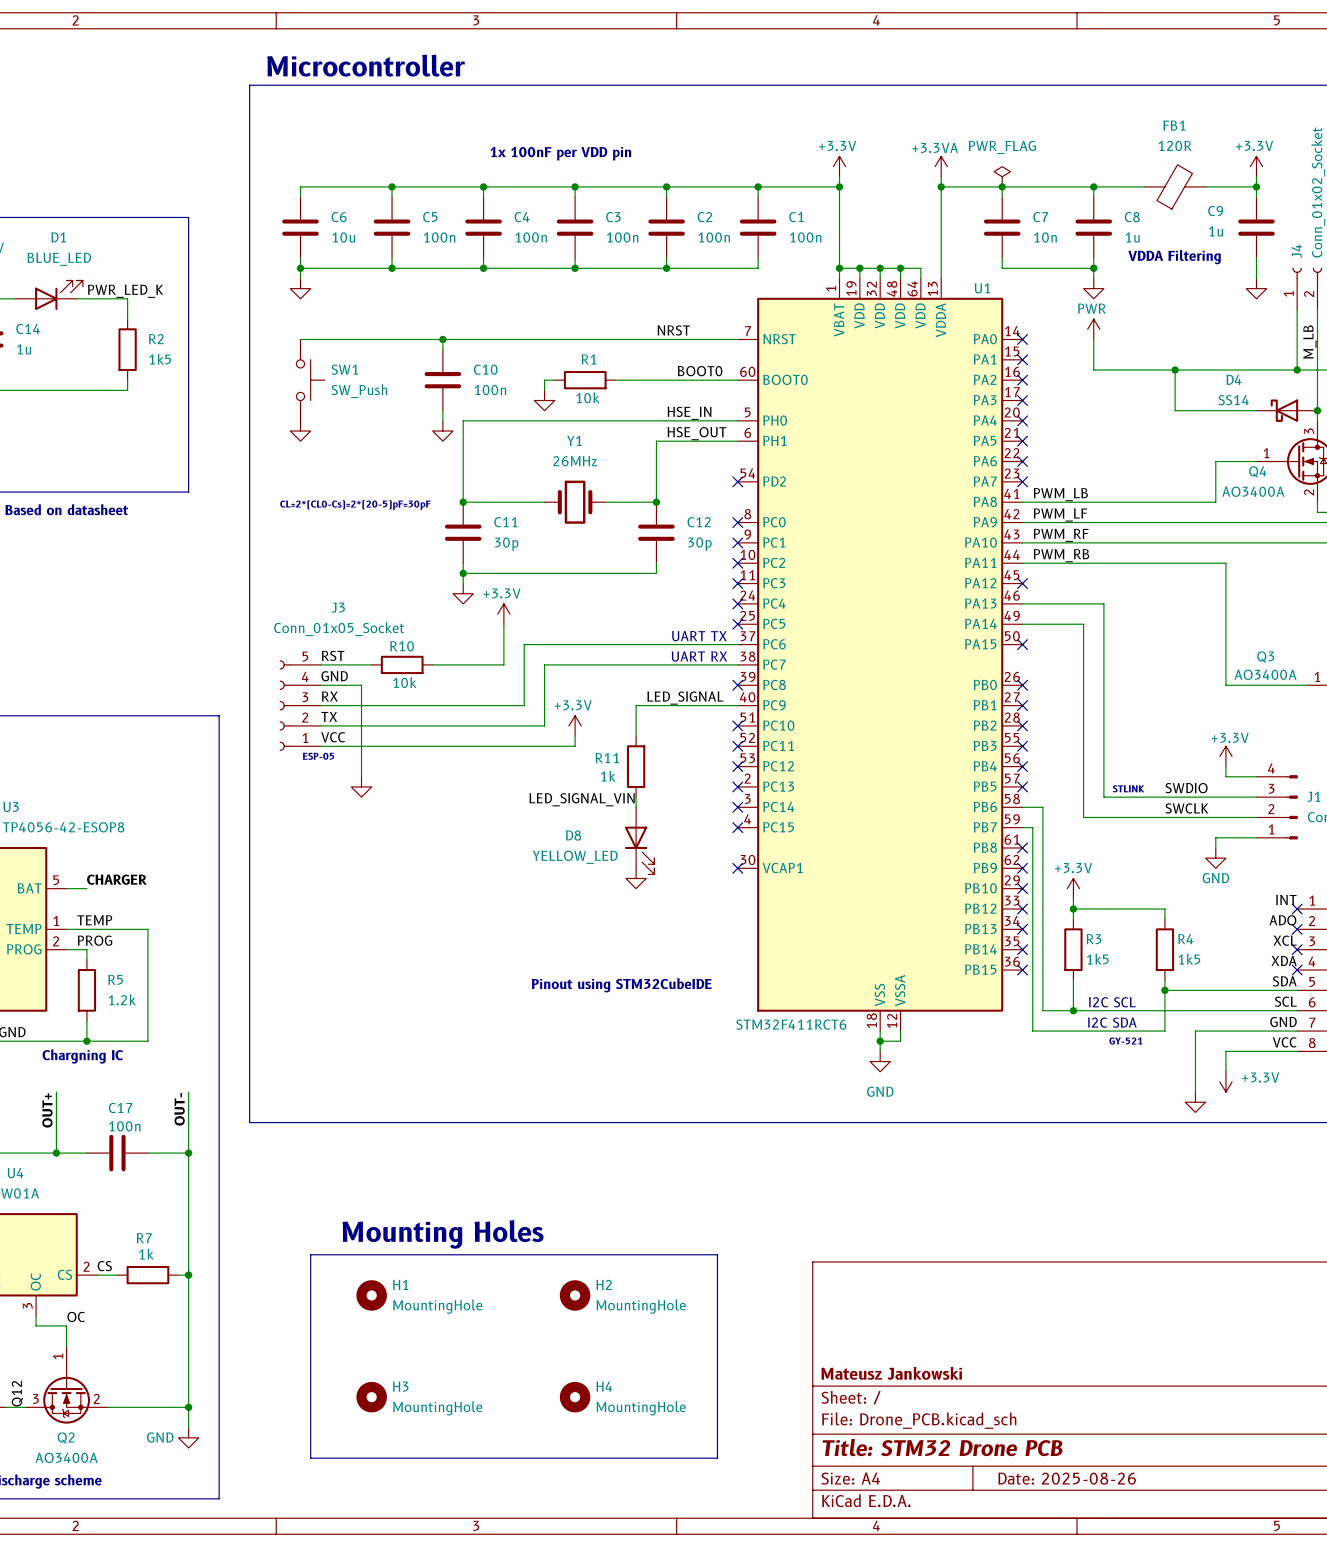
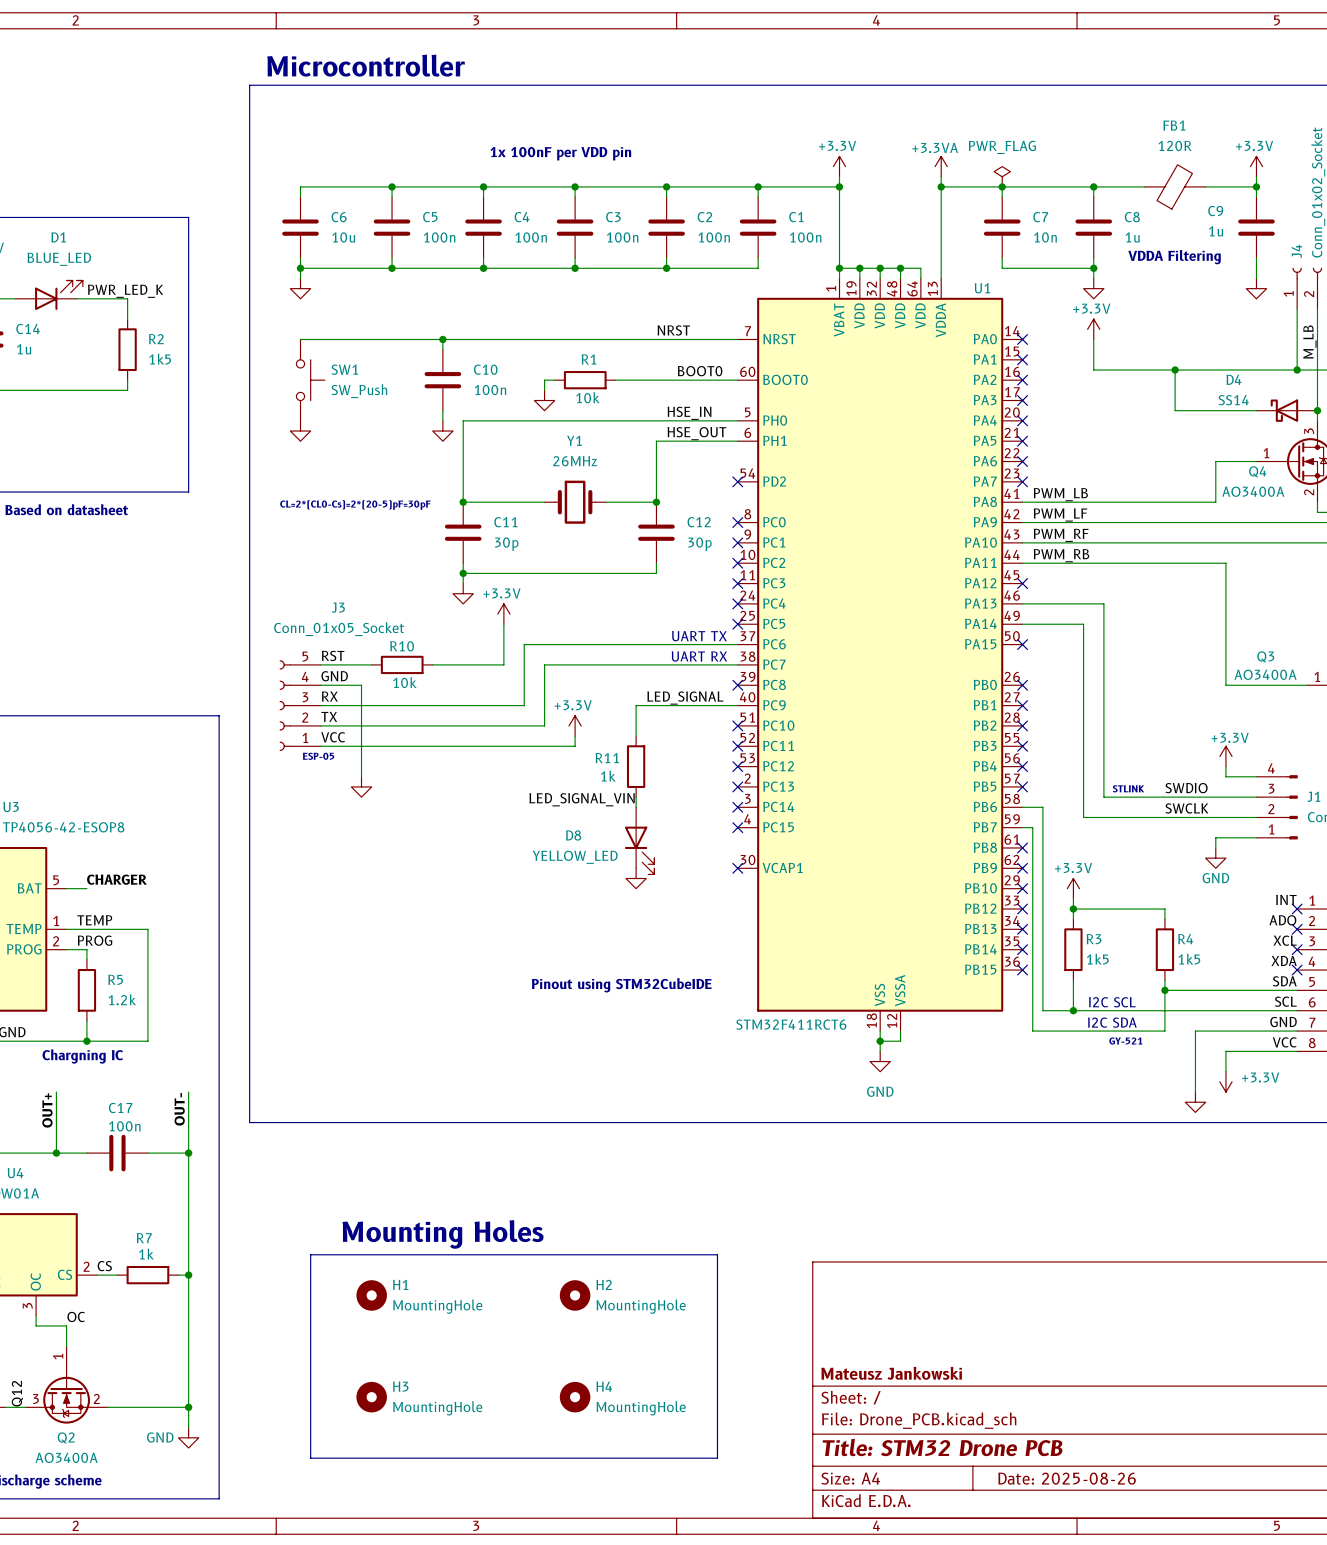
power symbol: PWR (1093, 329) -> +3.3V (1093, 329)

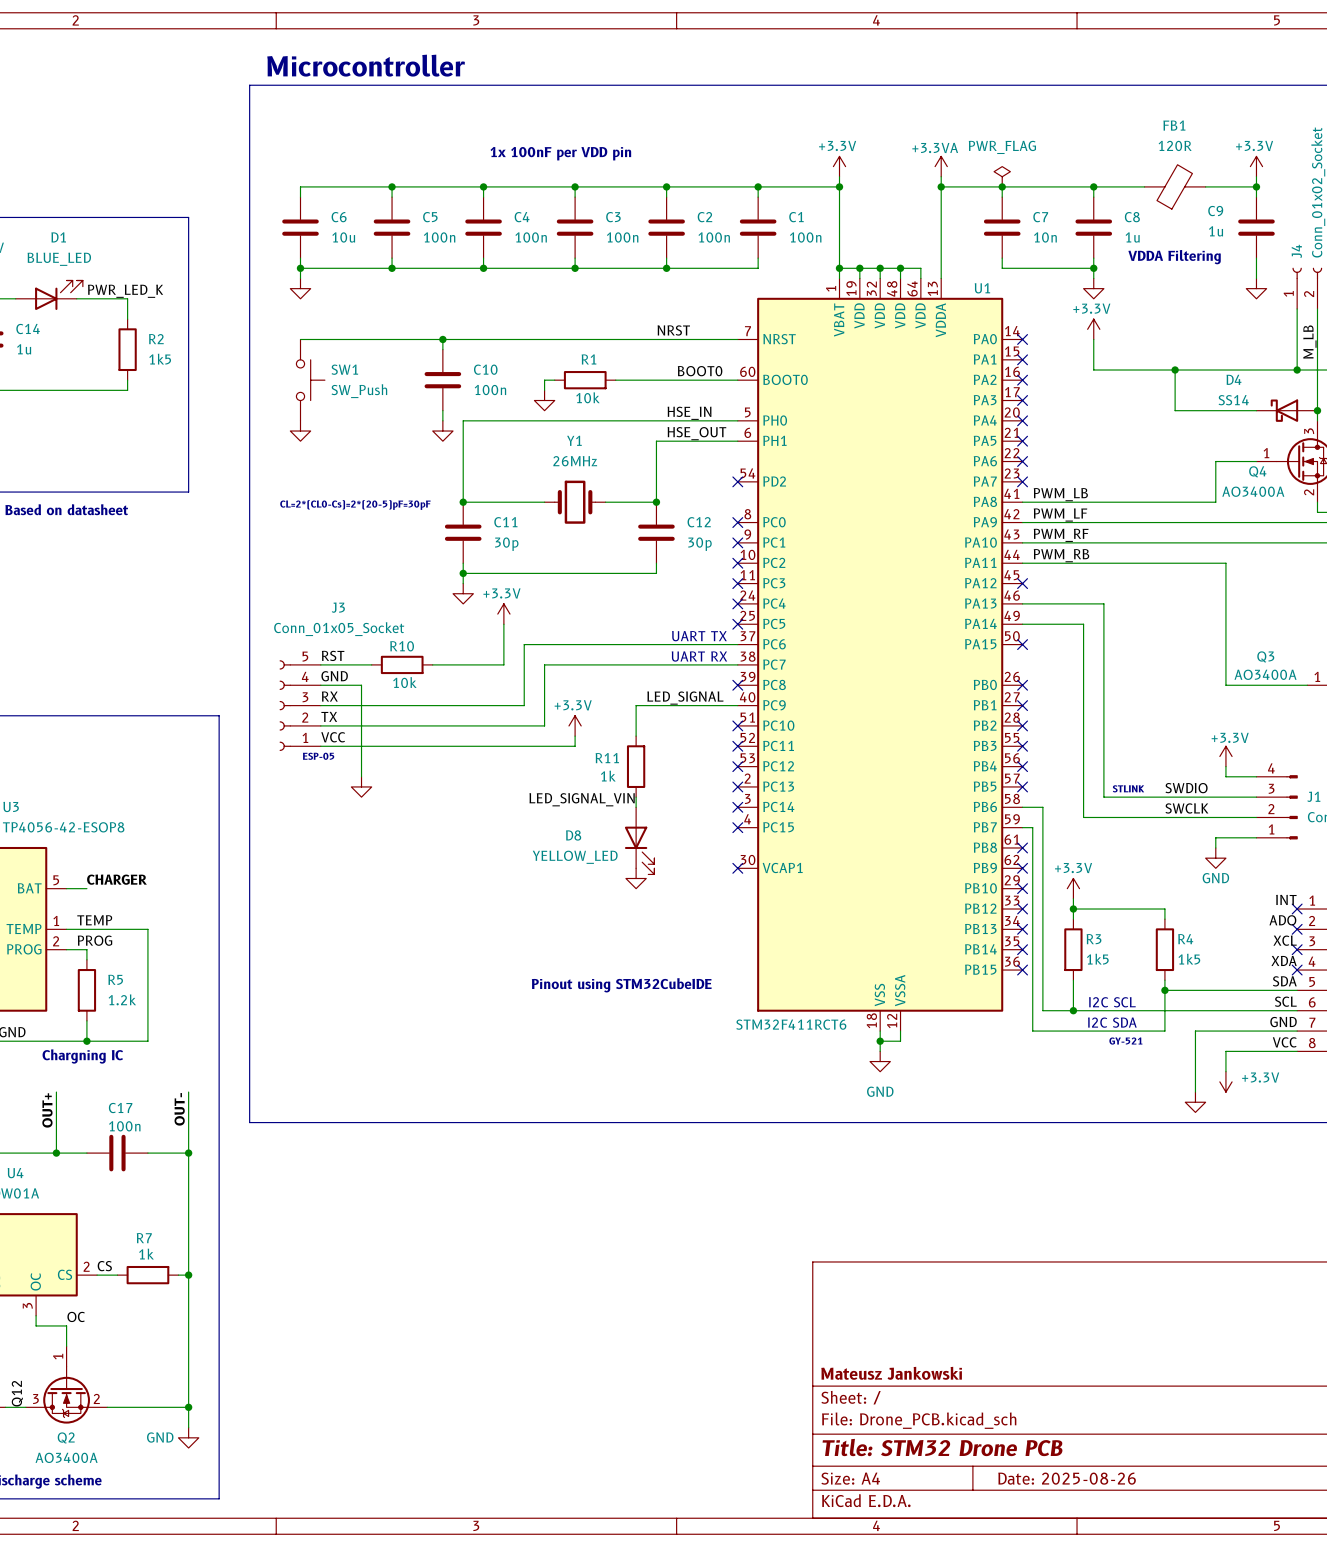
text: Mounting Holes (443, 1234) -> none
line: (310, 1254) (717, 1254) (717, 1458) (310, 1458) (310, 1254) -> none
H1: MountingHole (371, 1295) -> none
H2: MountingHole (575, 1295) -> none
H3: MountingHole (371, 1397) -> none
H4: MountingHole (575, 1397) -> none

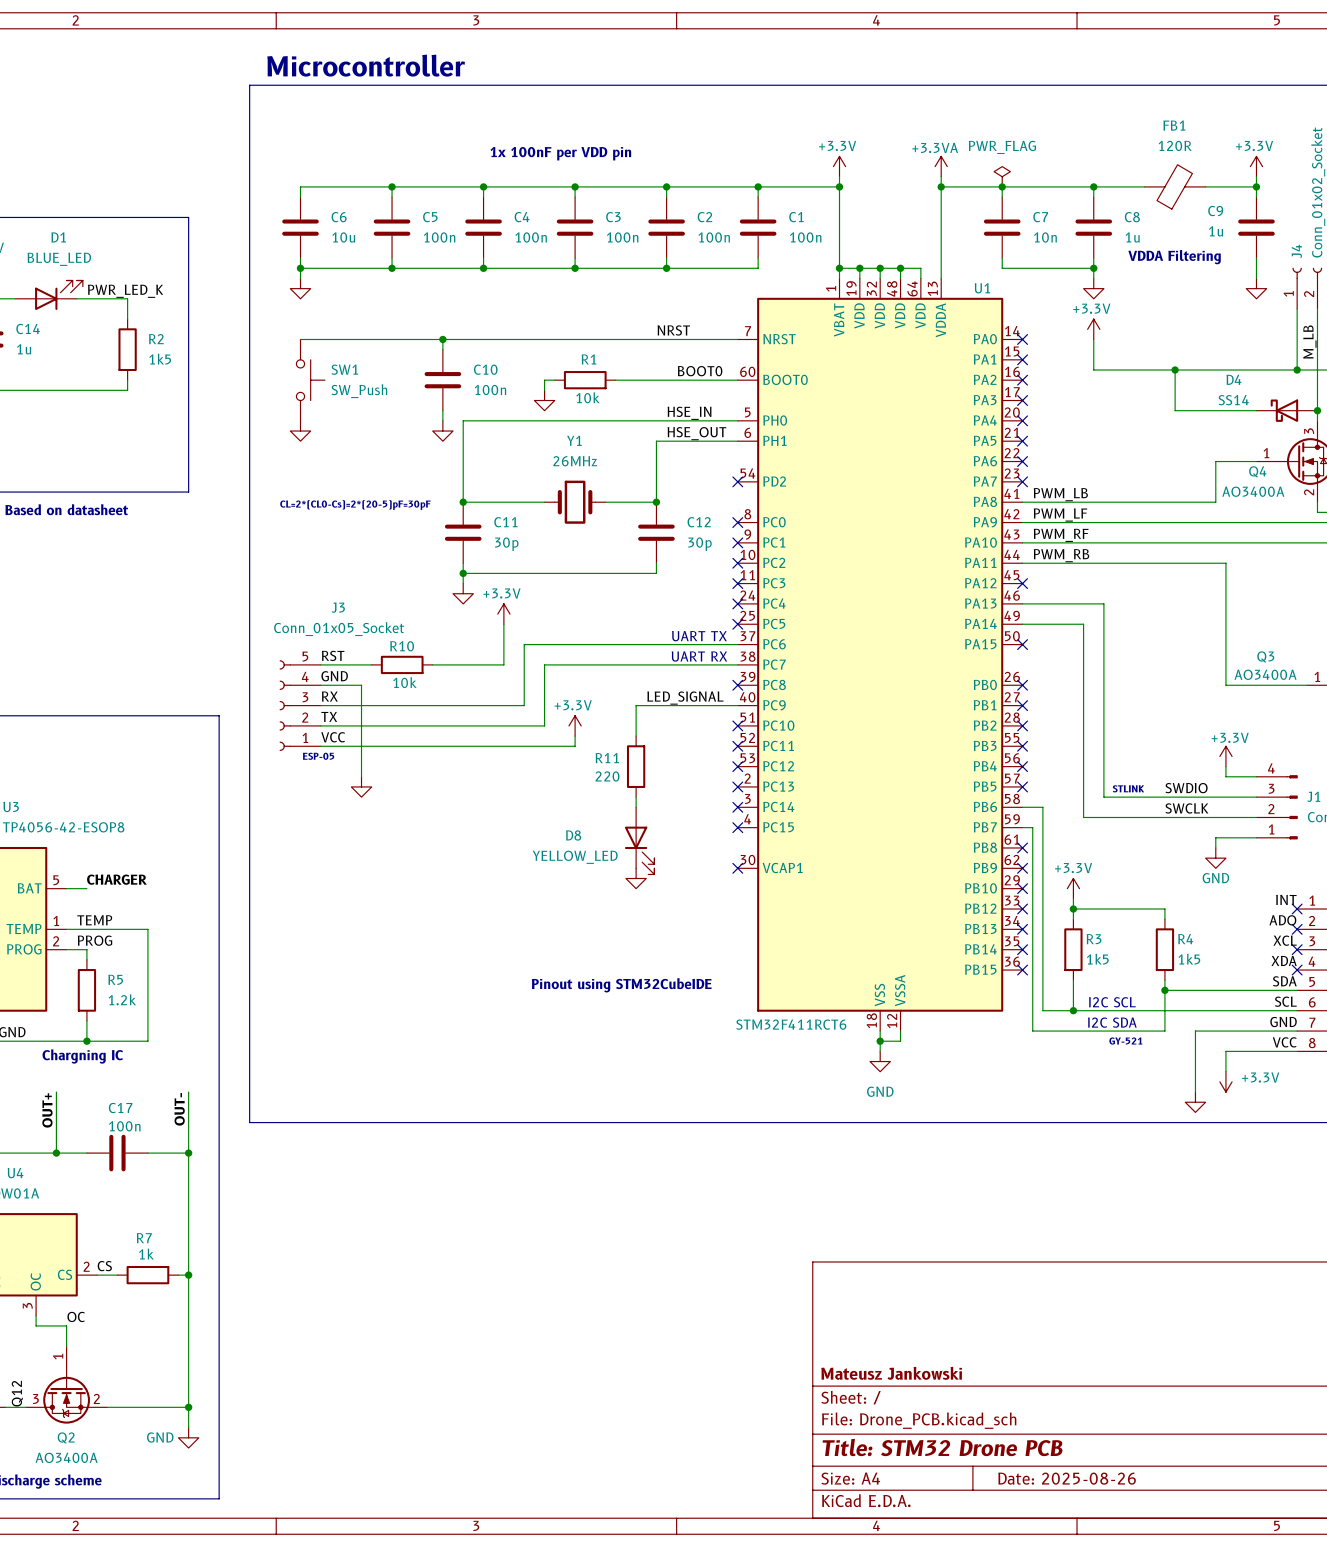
R11 value: 1k (608, 776) -> 220 (607, 776)
label: LED_SIGNAL_VIN (582, 799) -> none

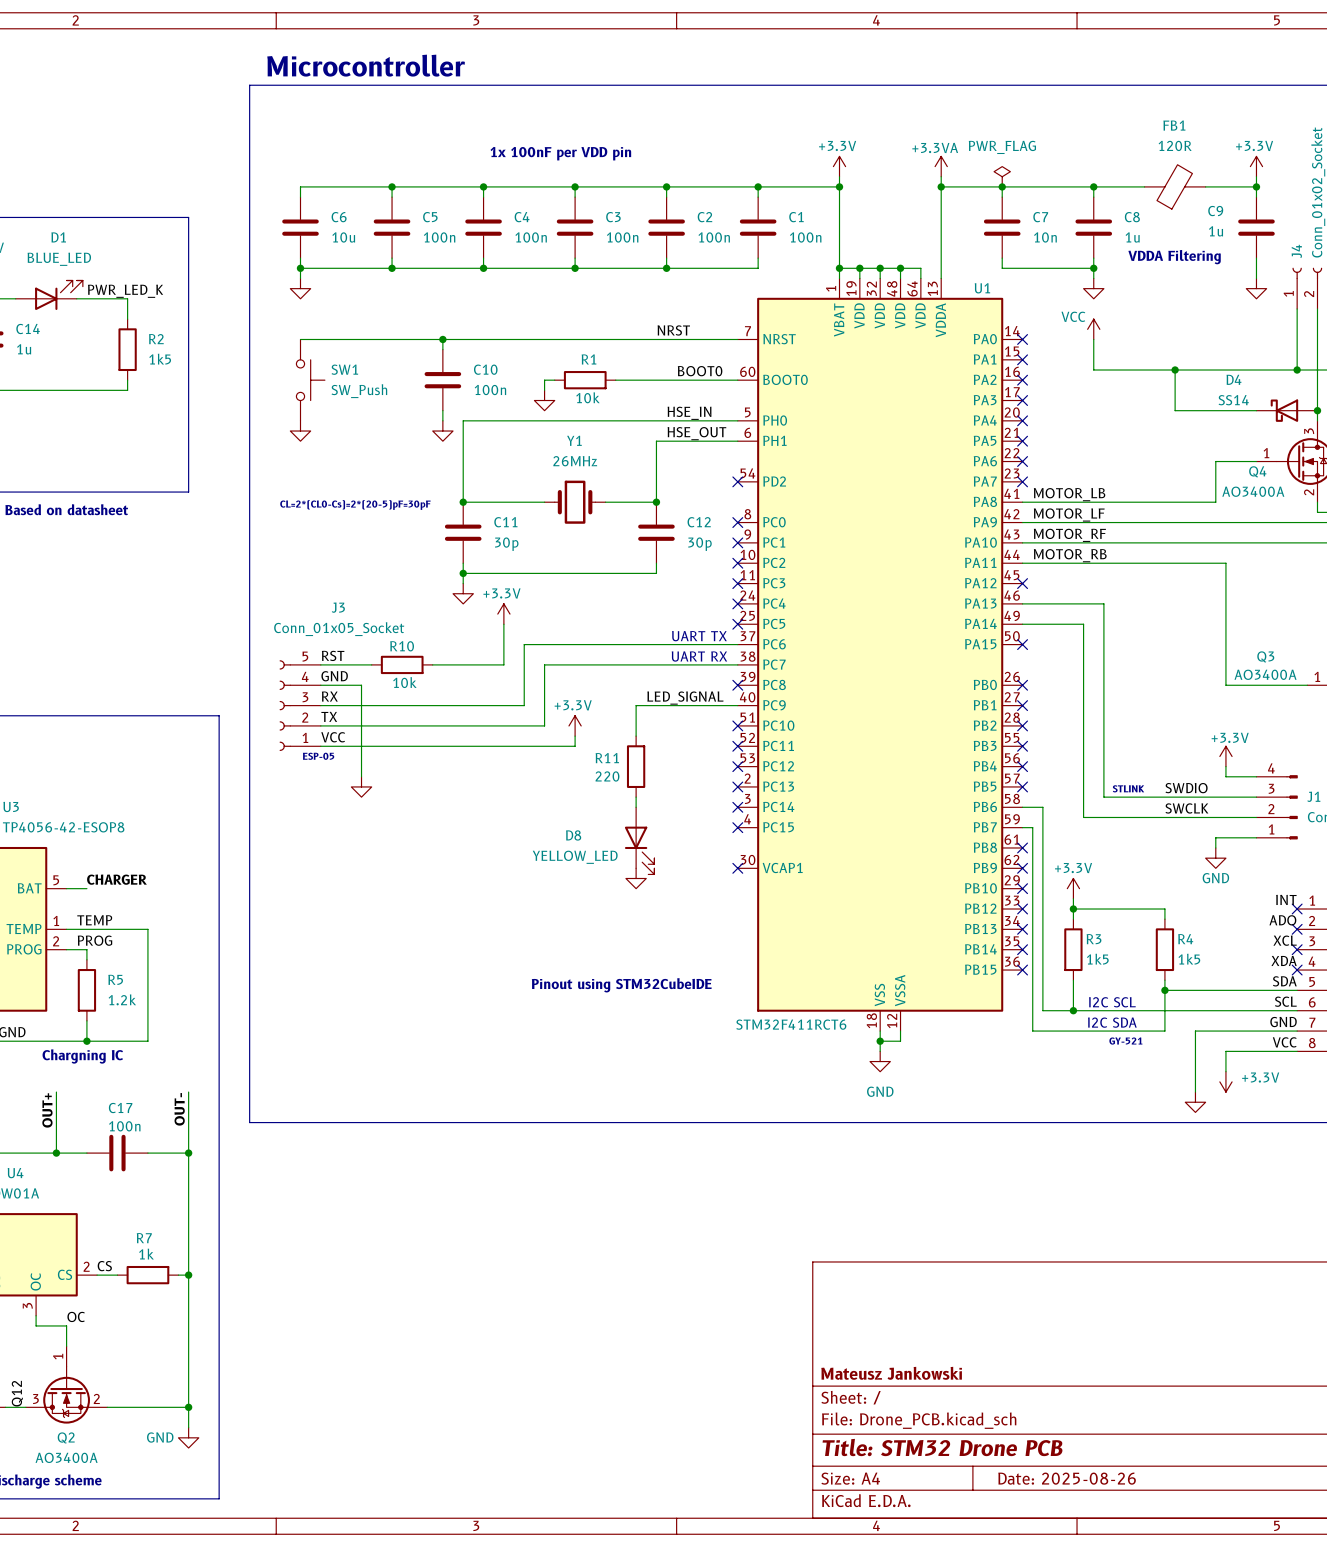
power symbol: +3.3V (1093, 329) -> VCC (1093, 329)
label: M_LB (1309, 342) -> none
label: PWM_LB (1060, 494) -> MOTOR_LB (1069, 494)
label: PWM_LF (1060, 514) -> MOTOR_LF (1069, 514)
label: PWM_RF (1061, 535) -> MOTOR_RF (1069, 535)
label: PWM_RB (1061, 555) -> MOTOR_RB (1070, 555)

